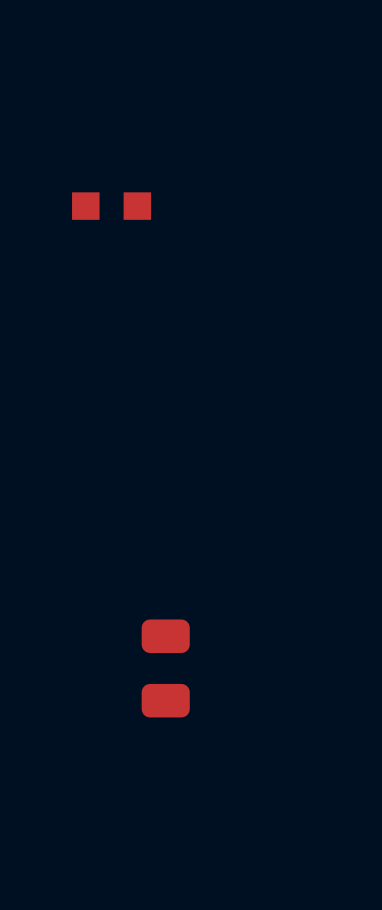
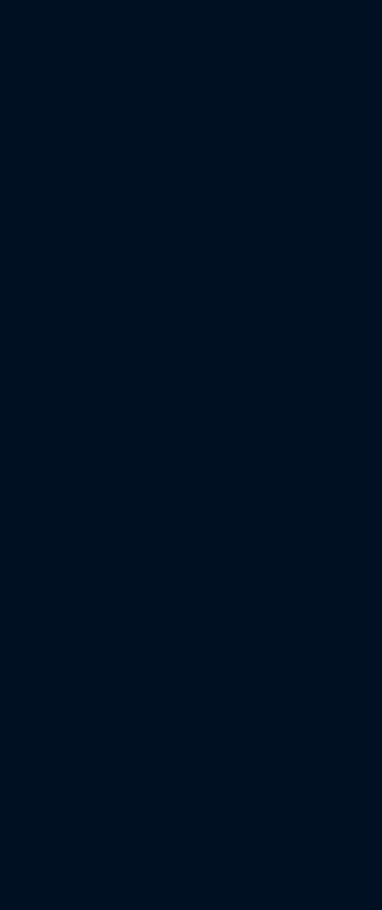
part: (111, 206) -> none
part: (165, 668) -> none

